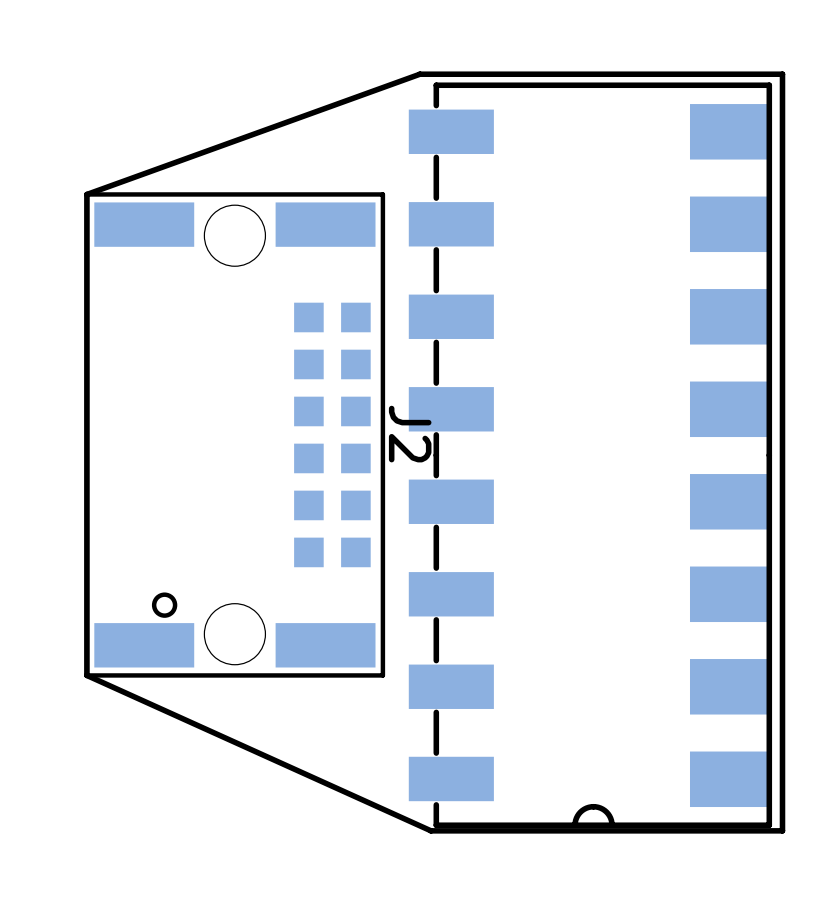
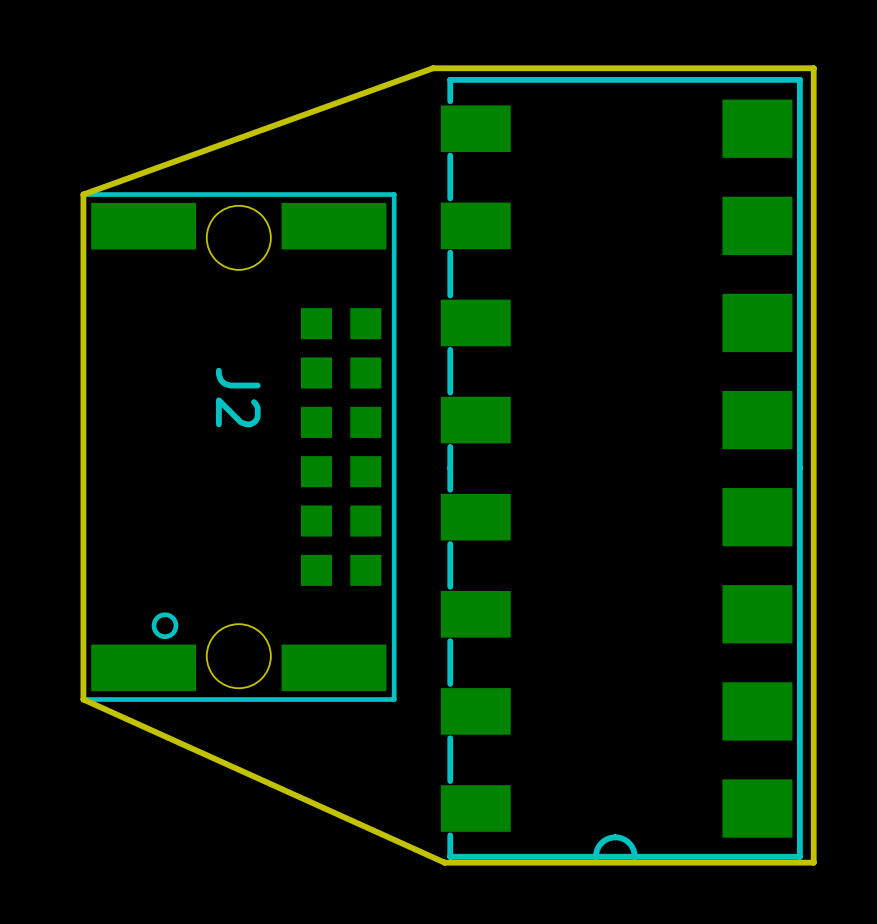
part footprint: [408, 82, 773, 829] -> [440, 76, 803, 860]
J2 name position: J2 (410, 434) -> J2 (238, 397)

